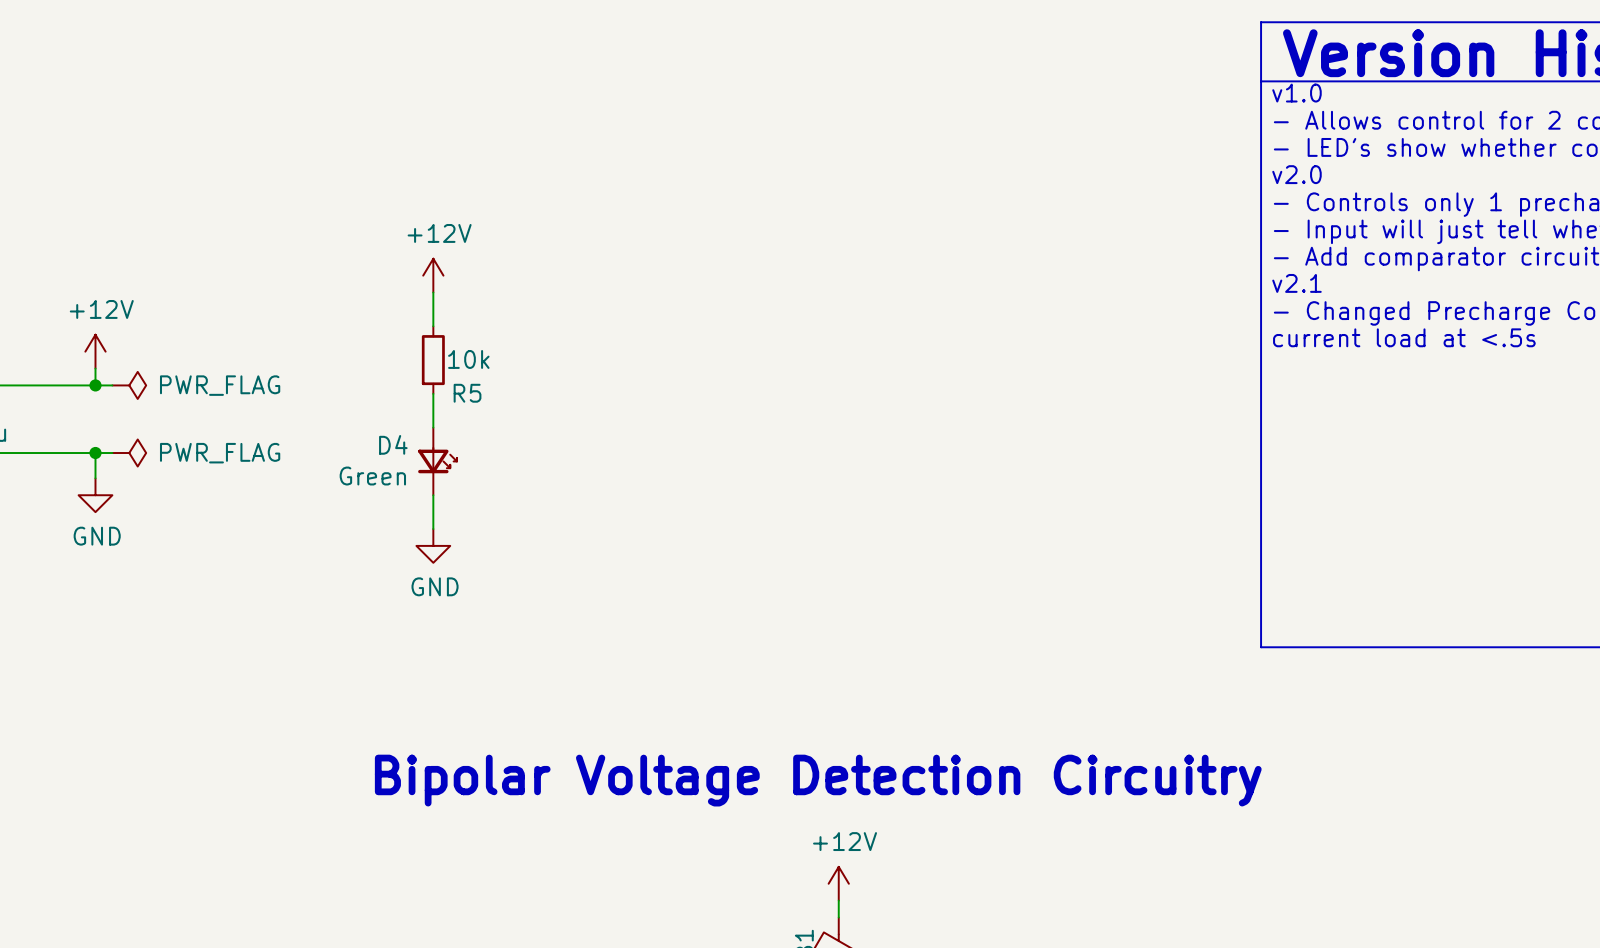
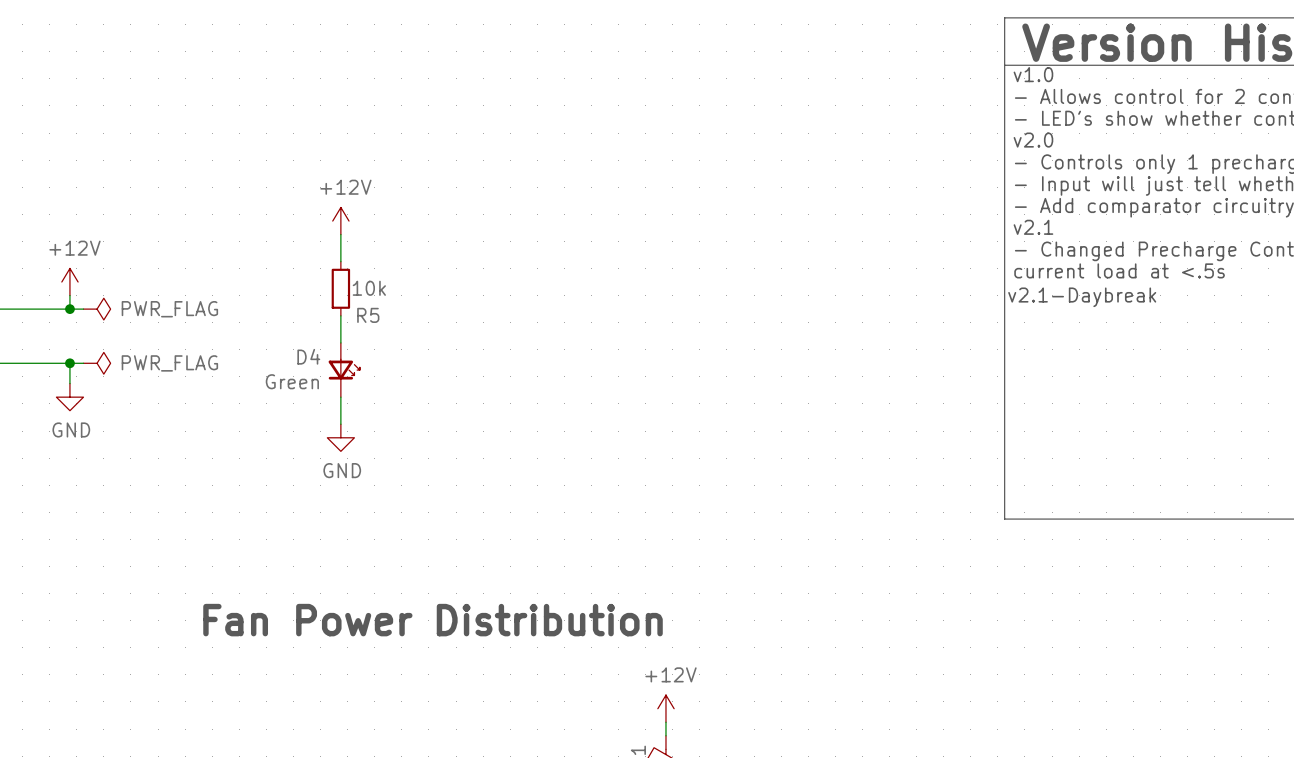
text: none -> v2.1-Daybreak (1082, 297)
text: none -> Fan Power Distribution (433, 620)
text: Bipolar Voltage Detection Circuitry (818, 780) -> none

